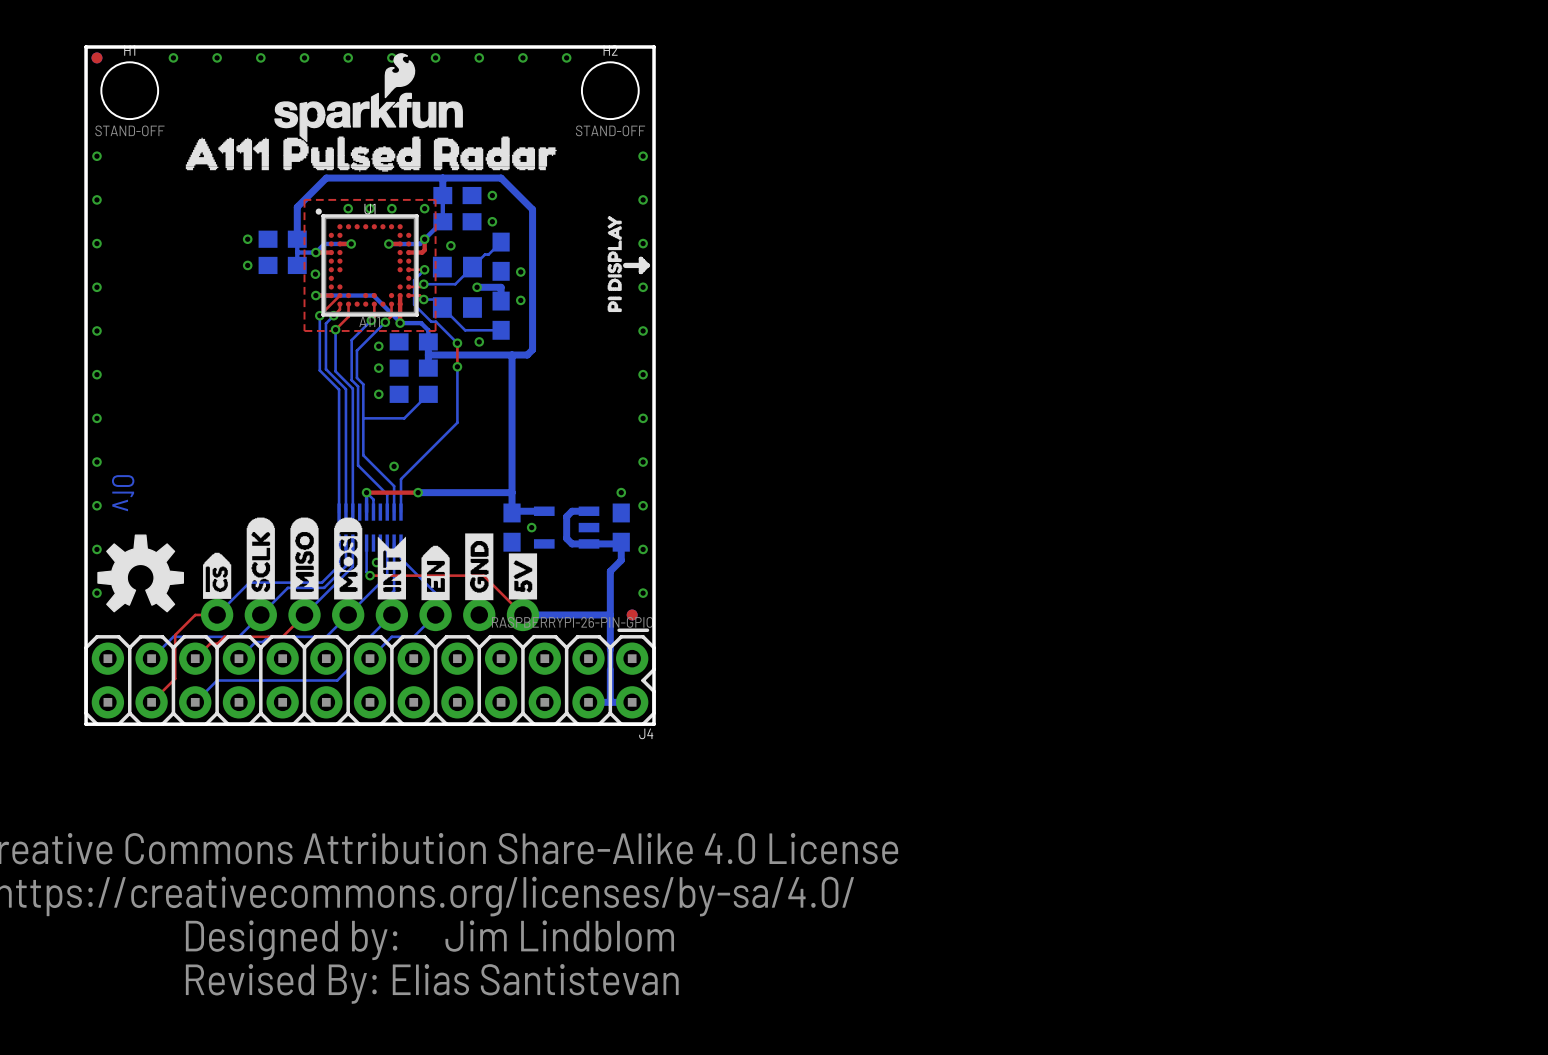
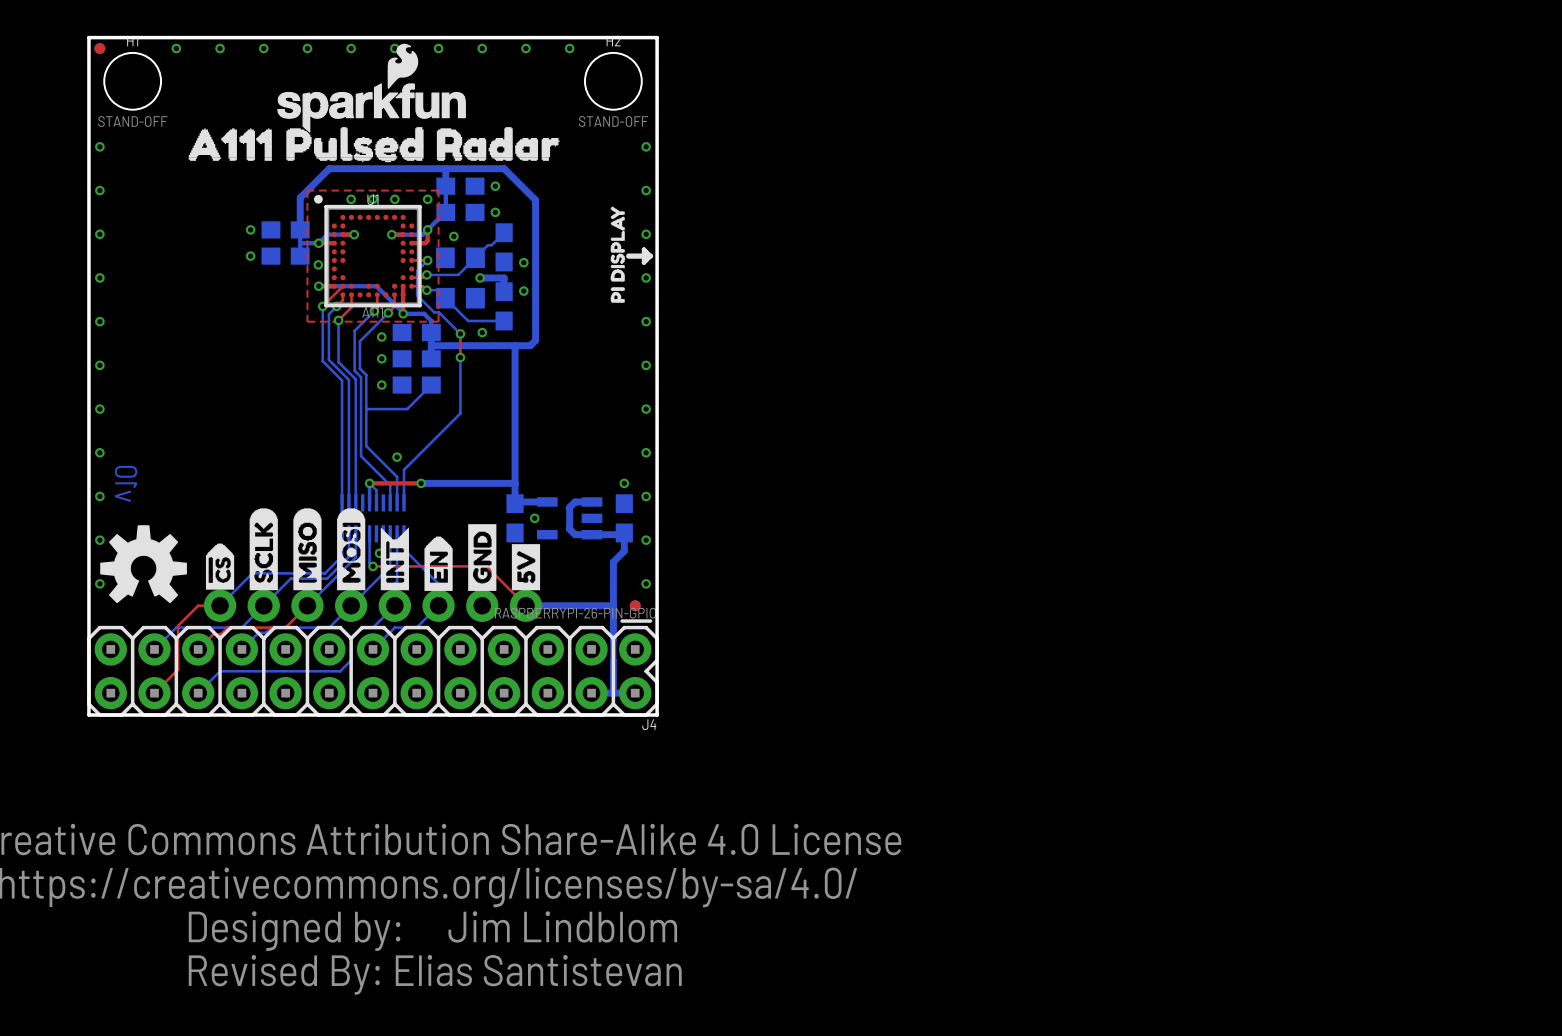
U1 footprint: [315, 208, 419, 317] -> [314, 194, 422, 308]

